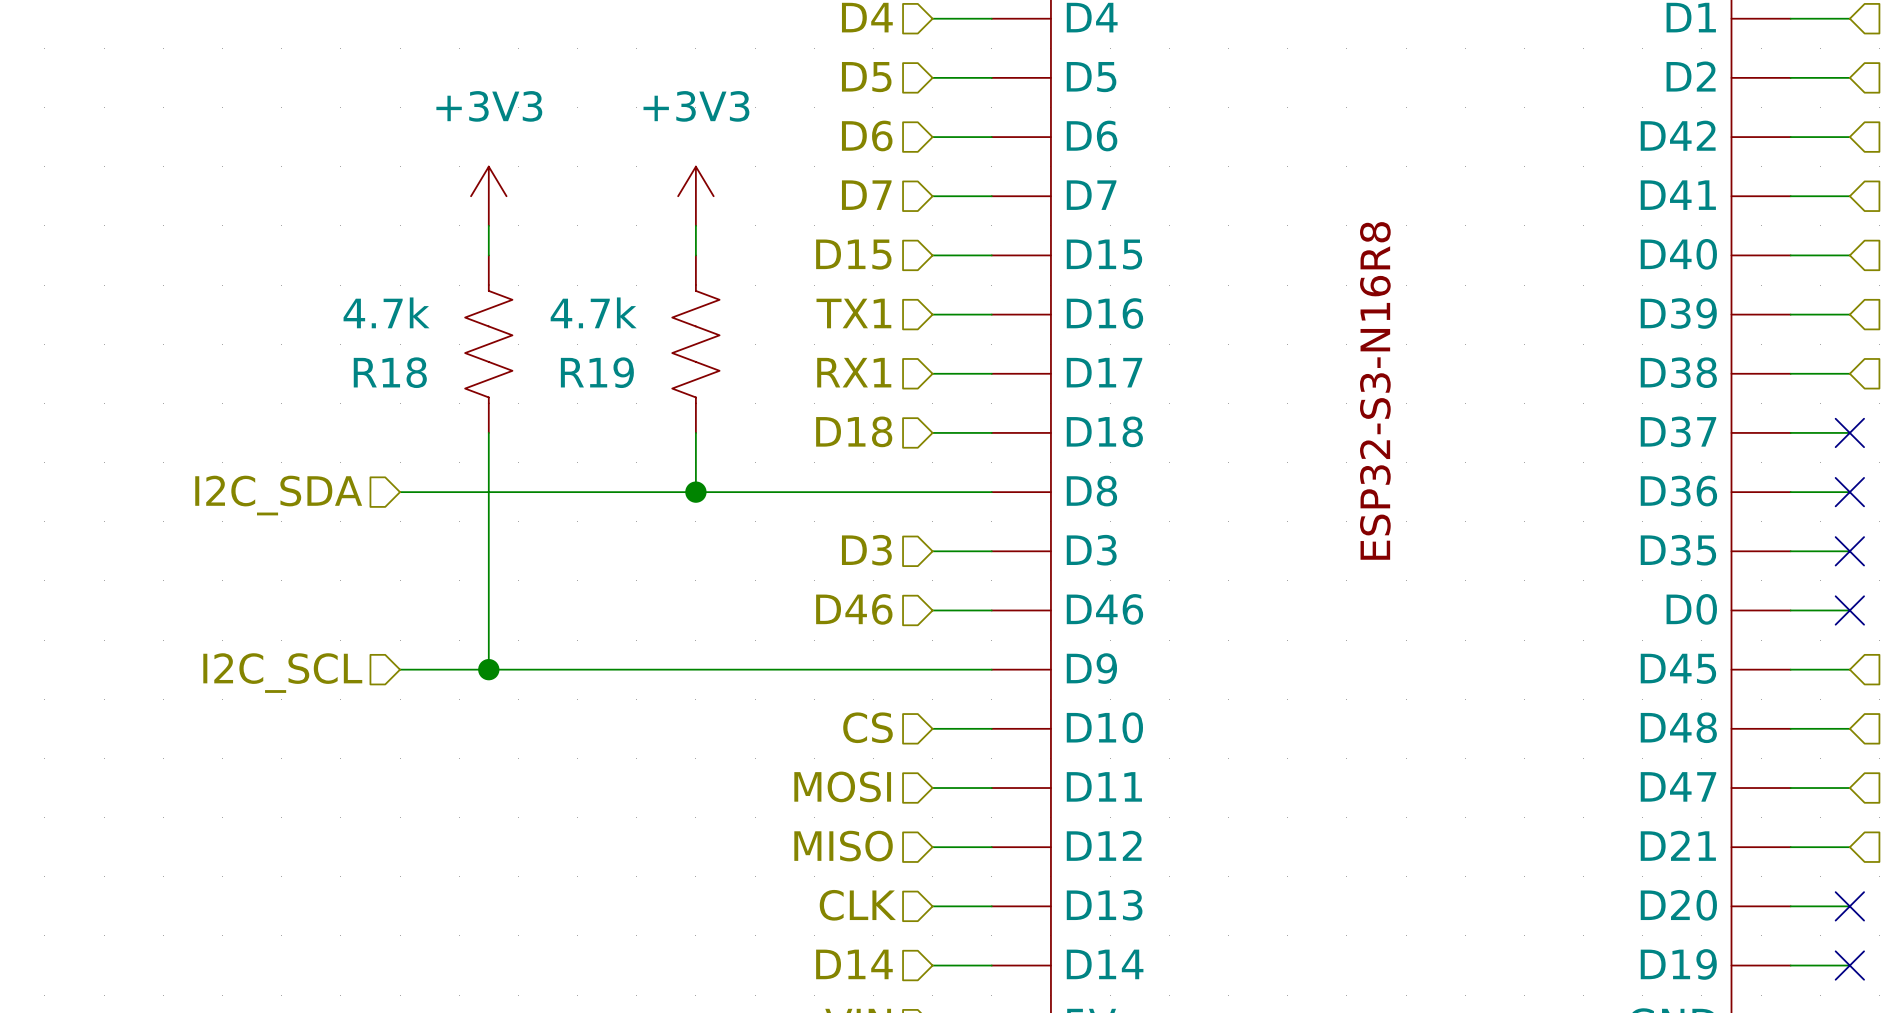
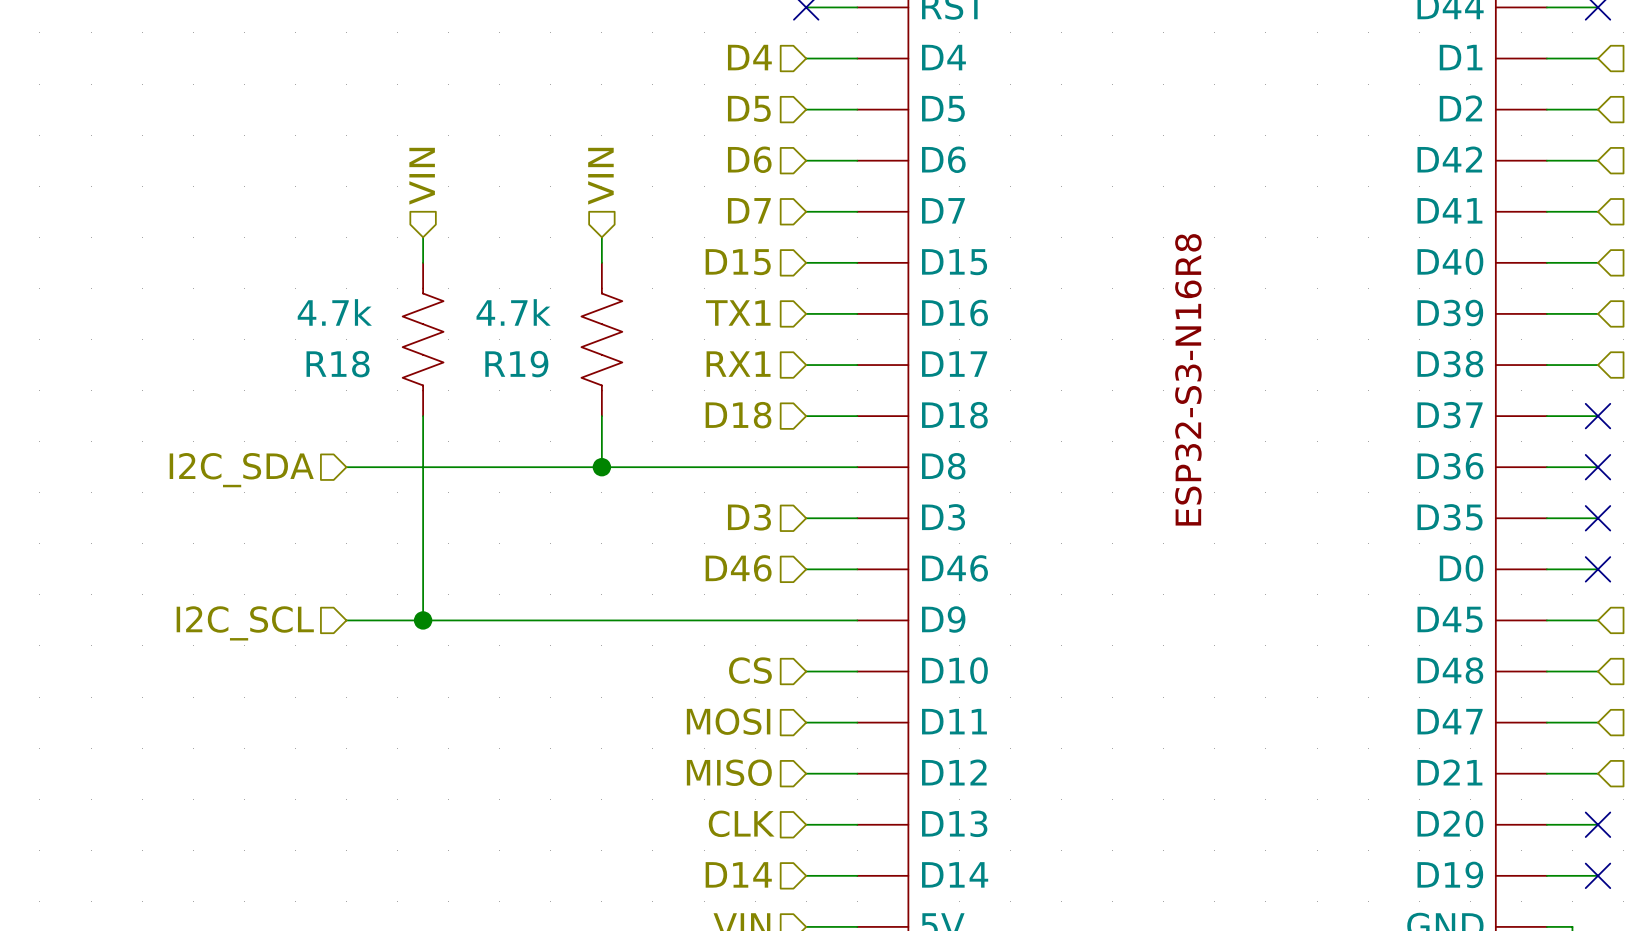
hierarchical label: none -> VIN (422, 176)
hierarchical label: none -> VIN (600, 176)
power symbol: +3V3 (488, 196) -> none
power symbol: +3V3 (695, 196) -> none

